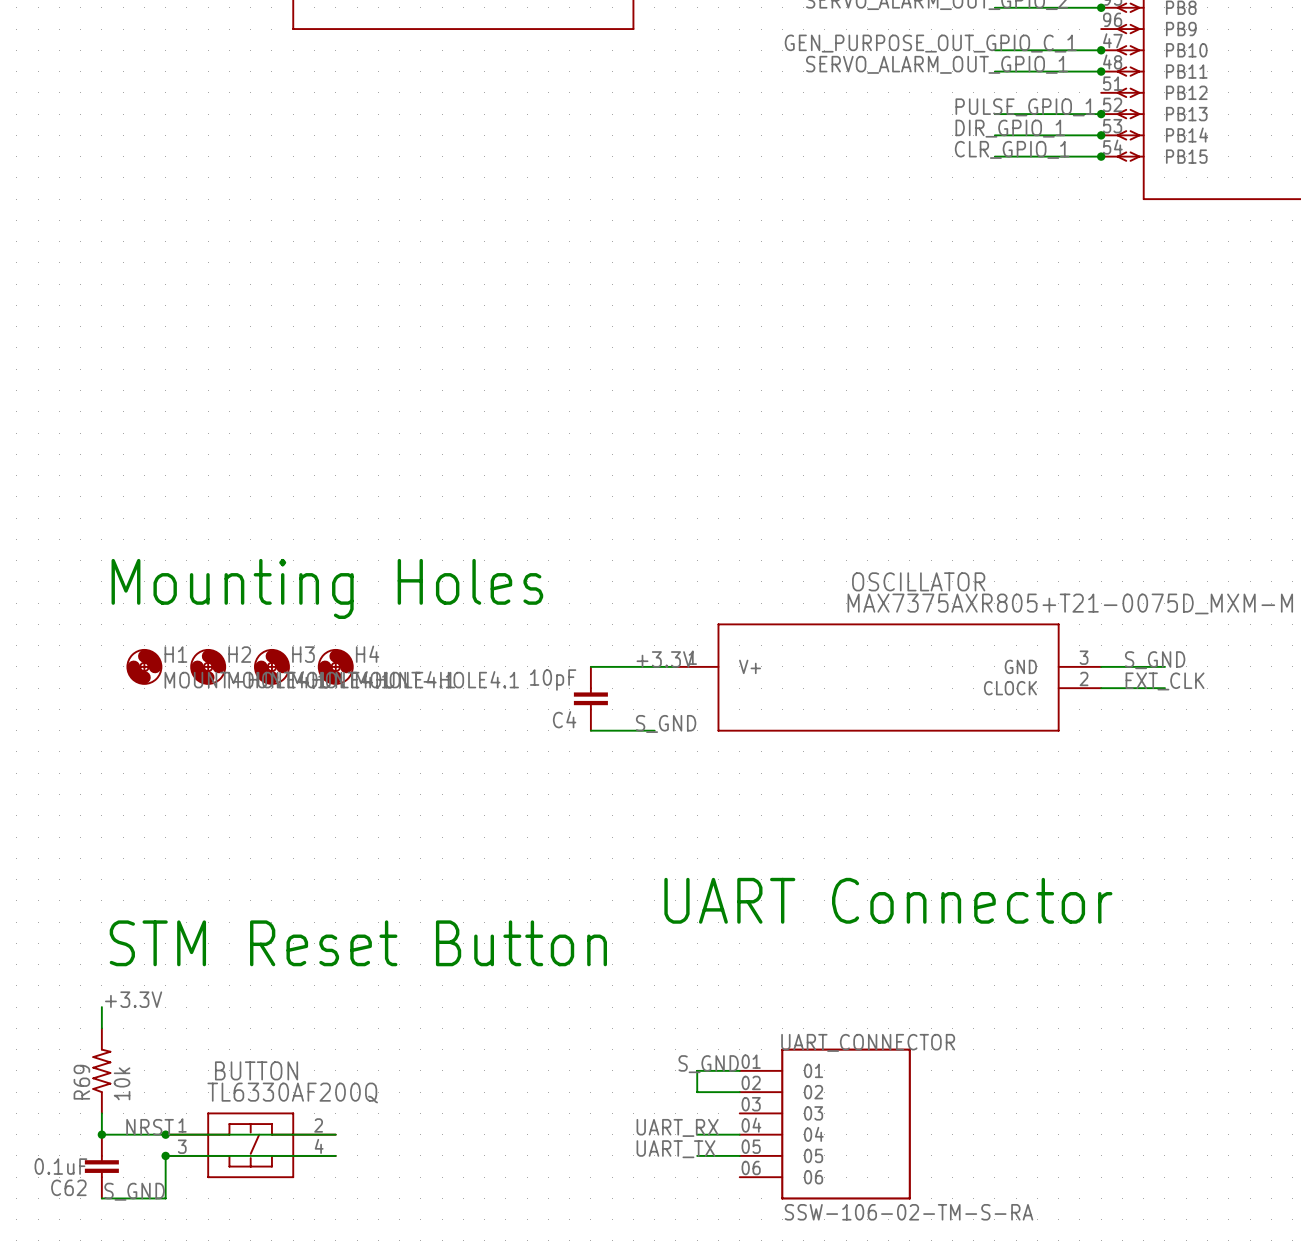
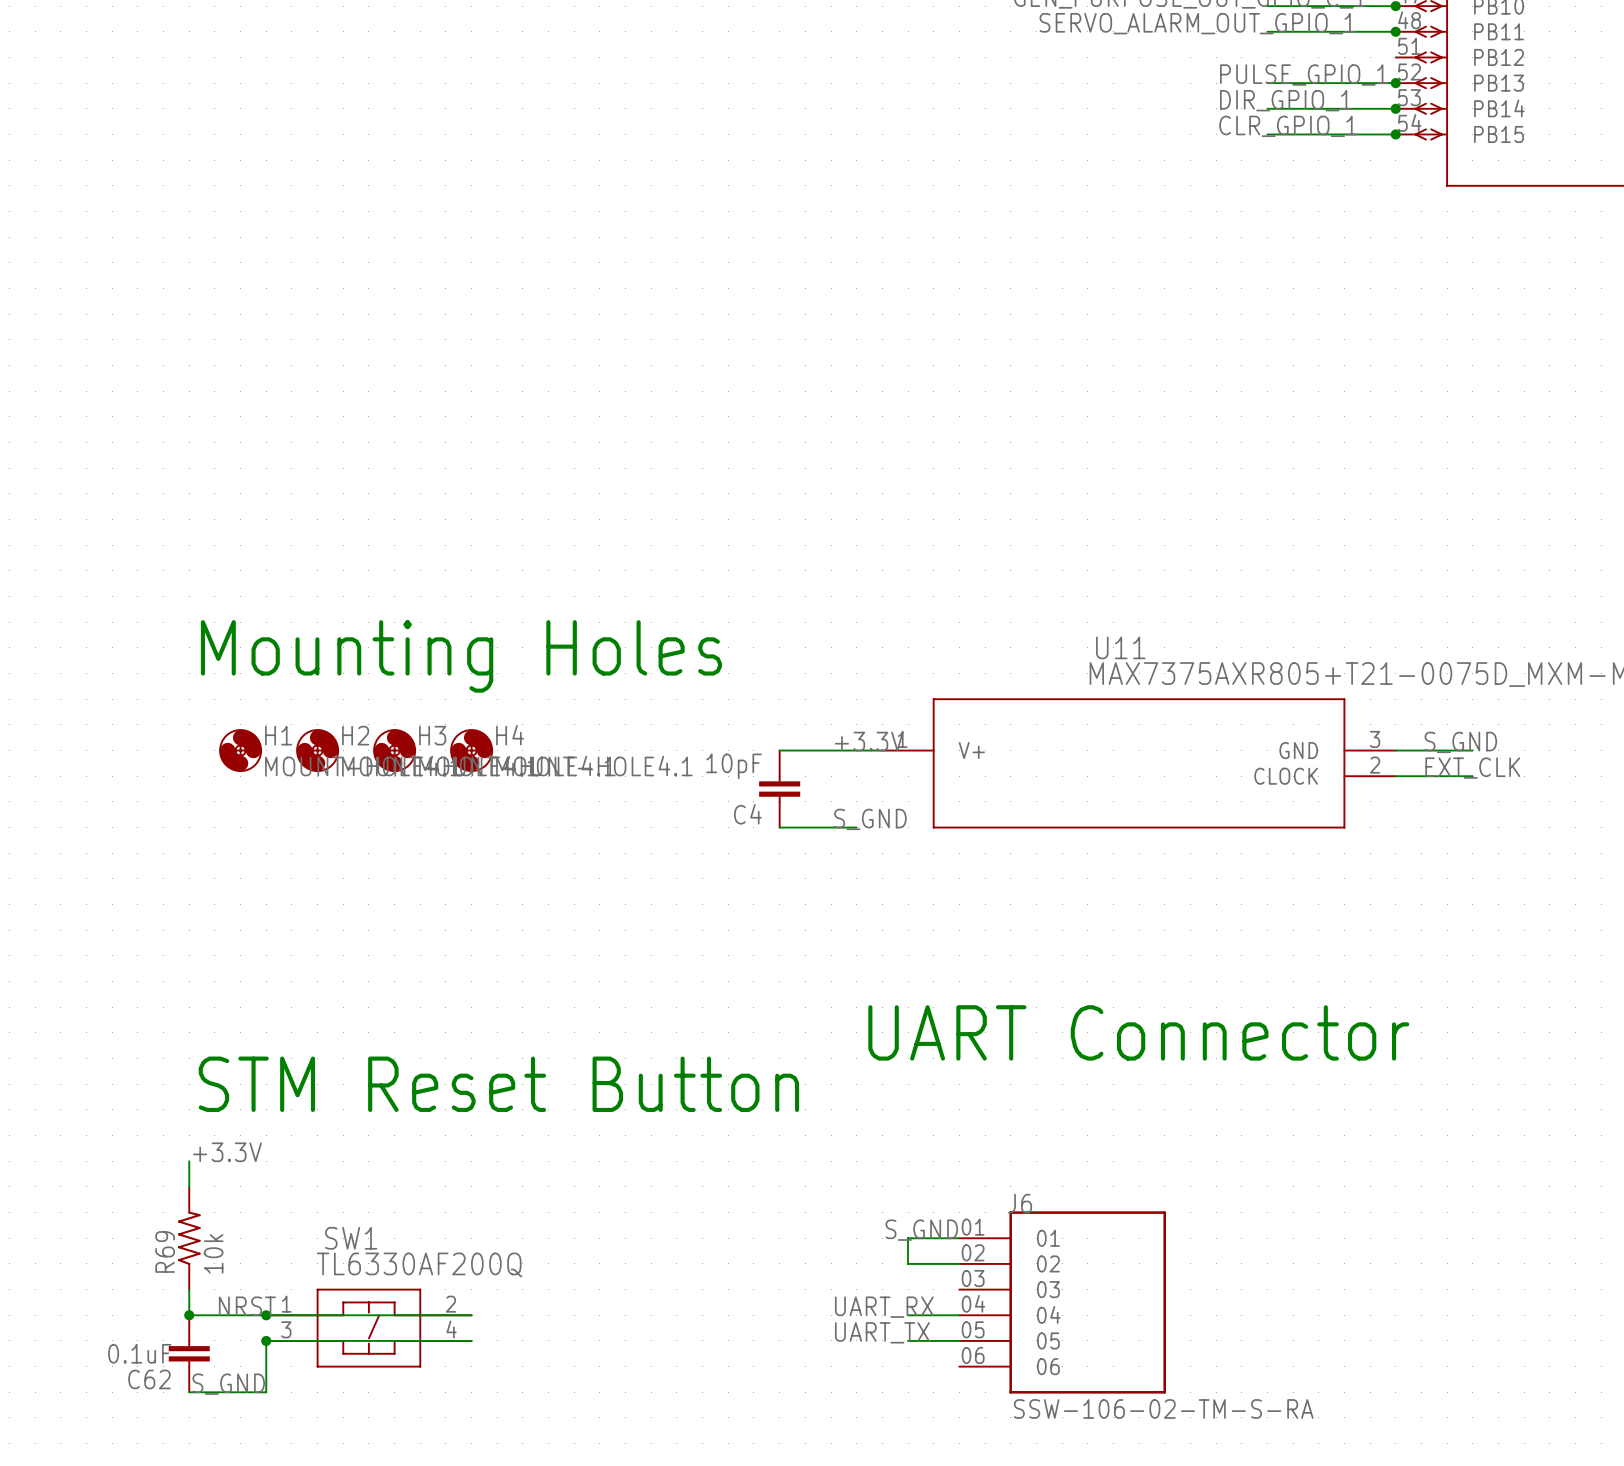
OSCILLATOR name: OSCILLATOR (918, 581) -> U11 (1120, 647)
UART_CONNECTOR name: UART_CONNECTOR (868, 1042) -> J6 (1020, 1203)
BUTTON name: BUTTON (256, 1070) -> SW1 (351, 1238)

